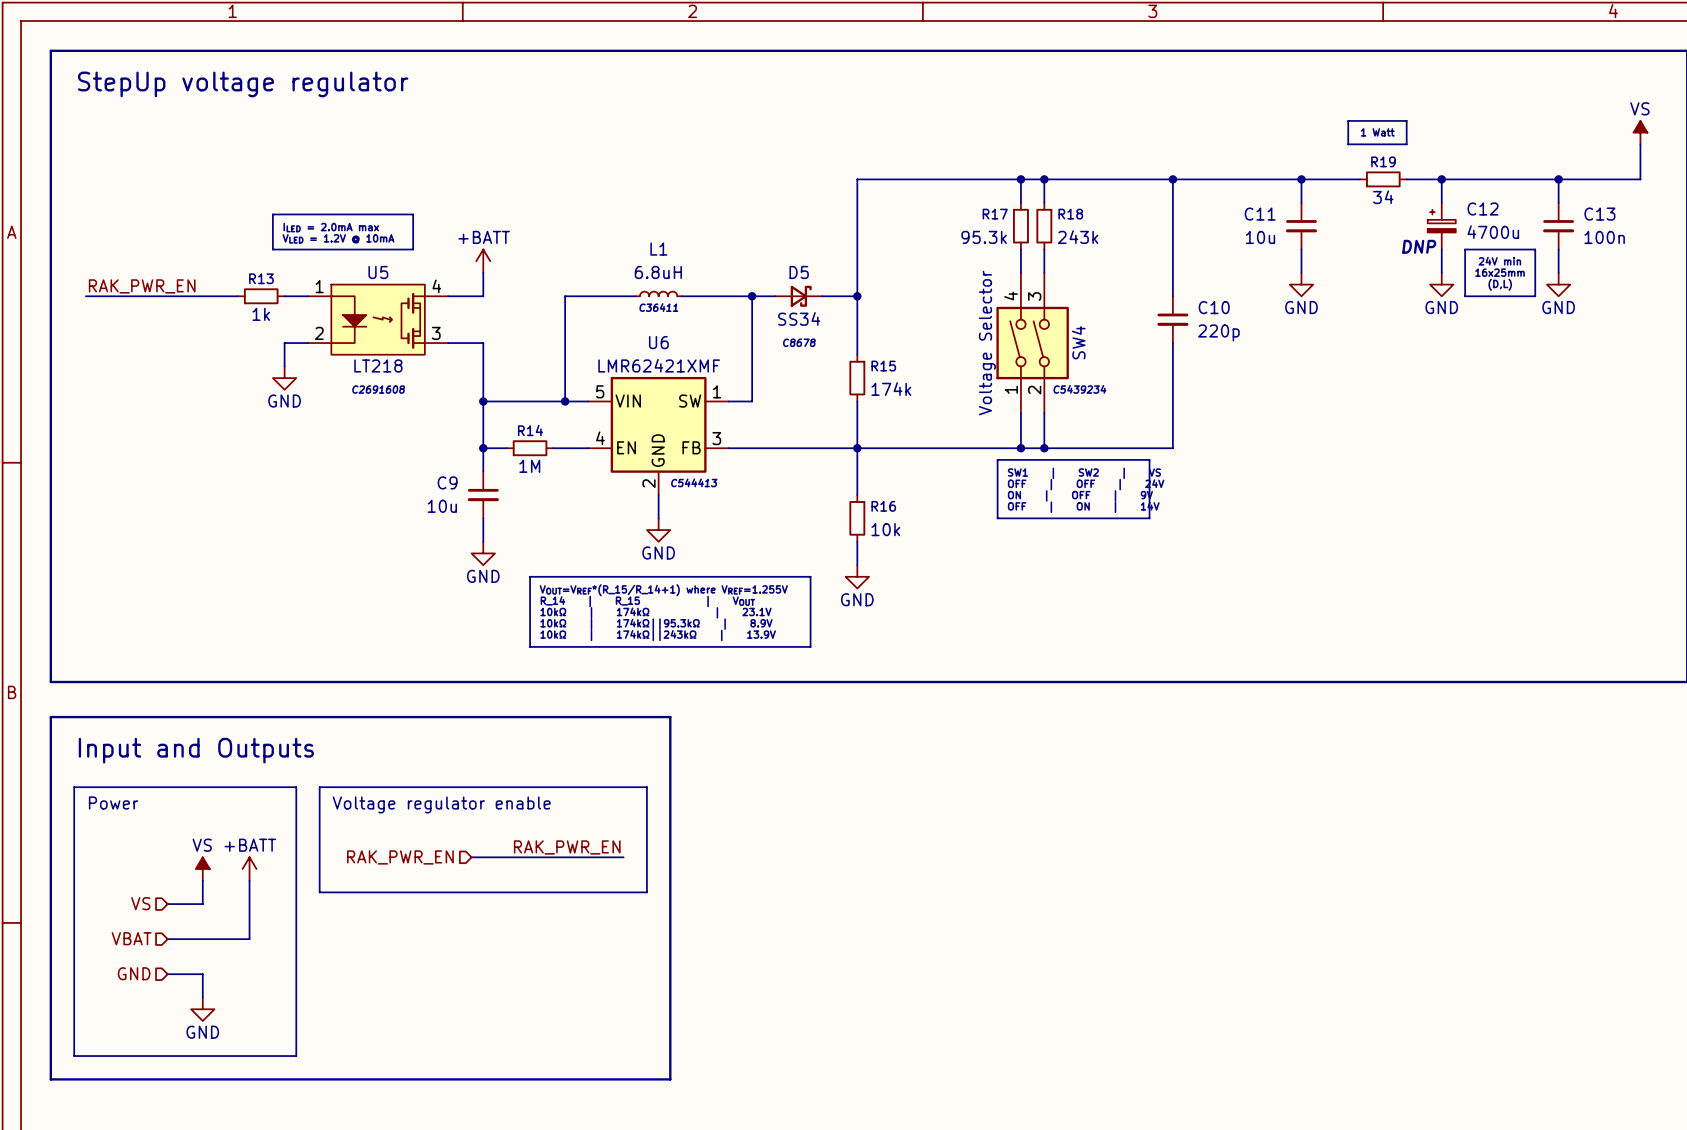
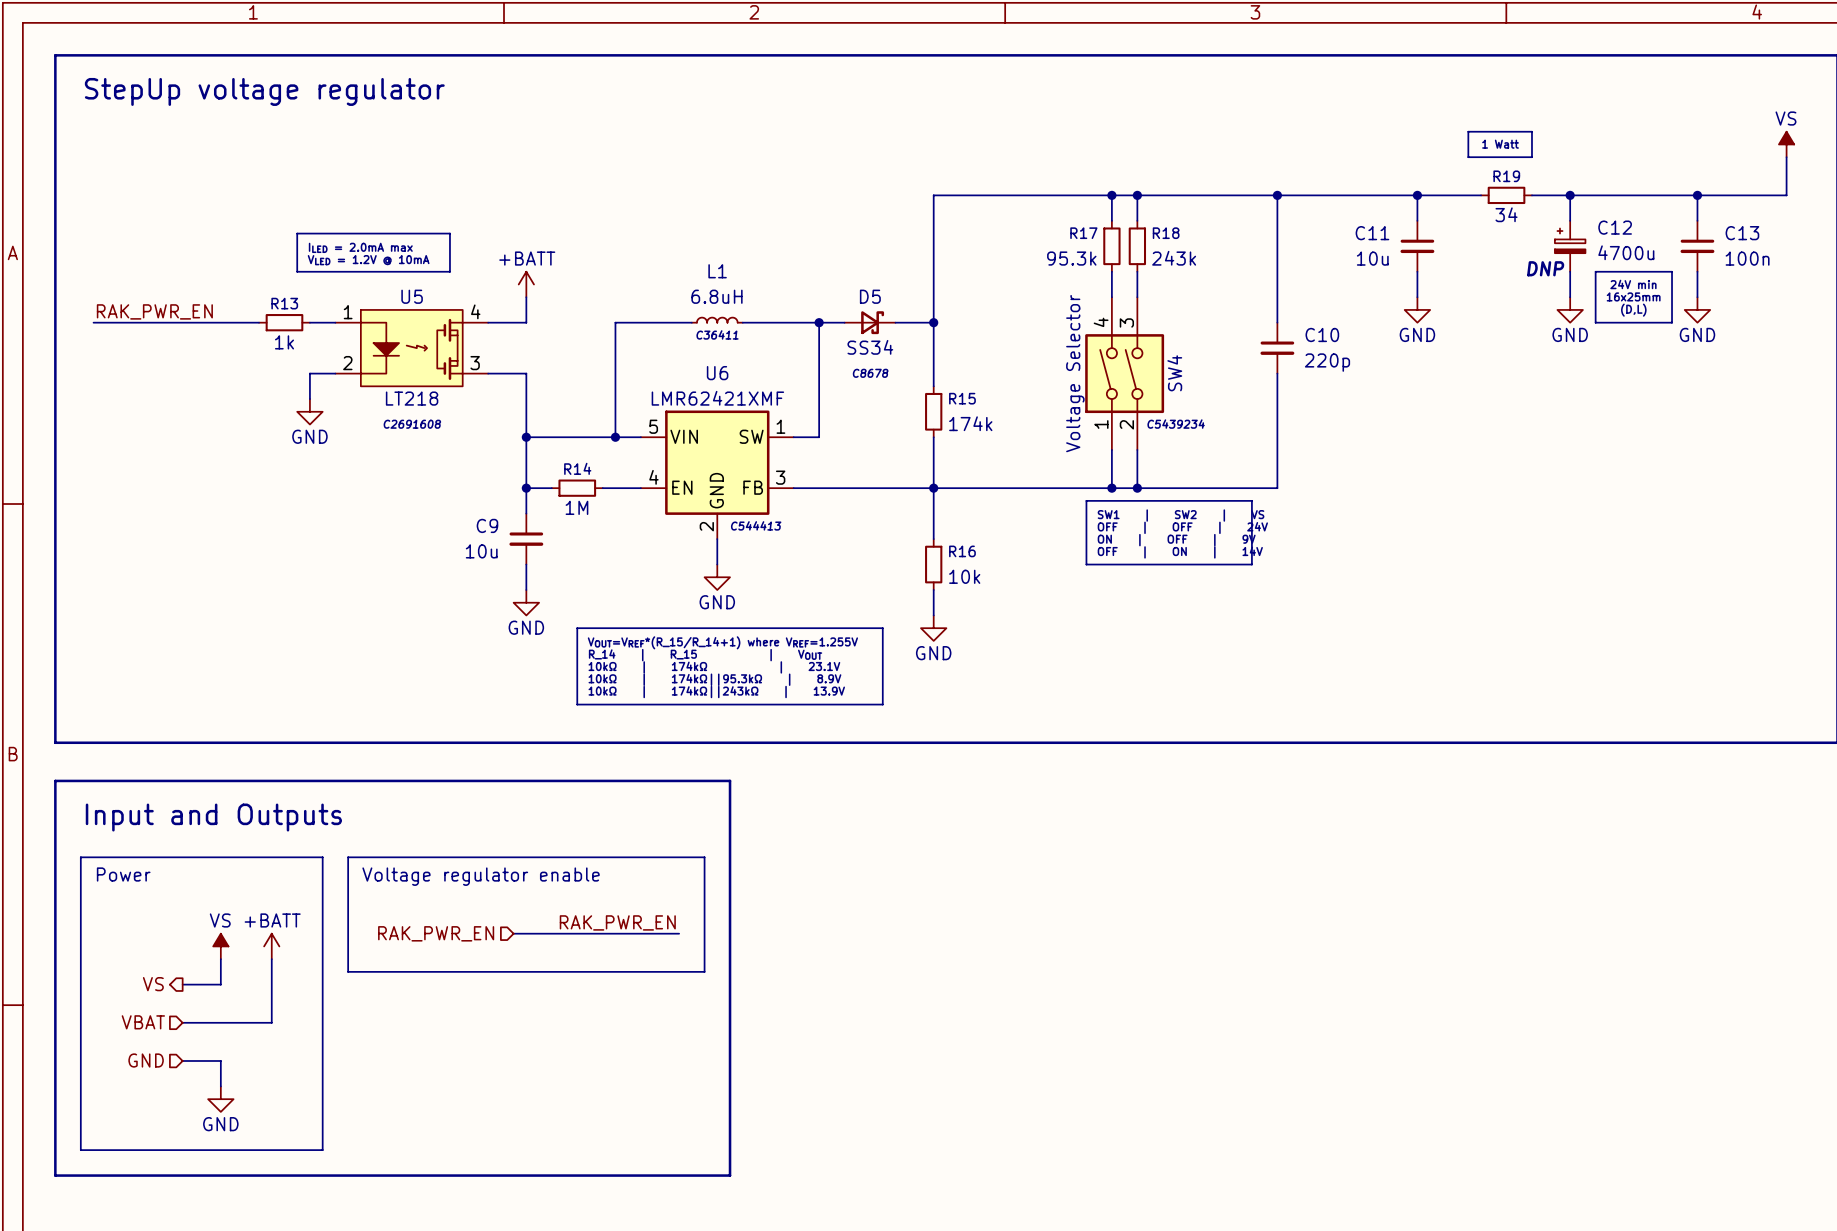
hierarchical label shape: input (140, 903) -> output (153, 984)

